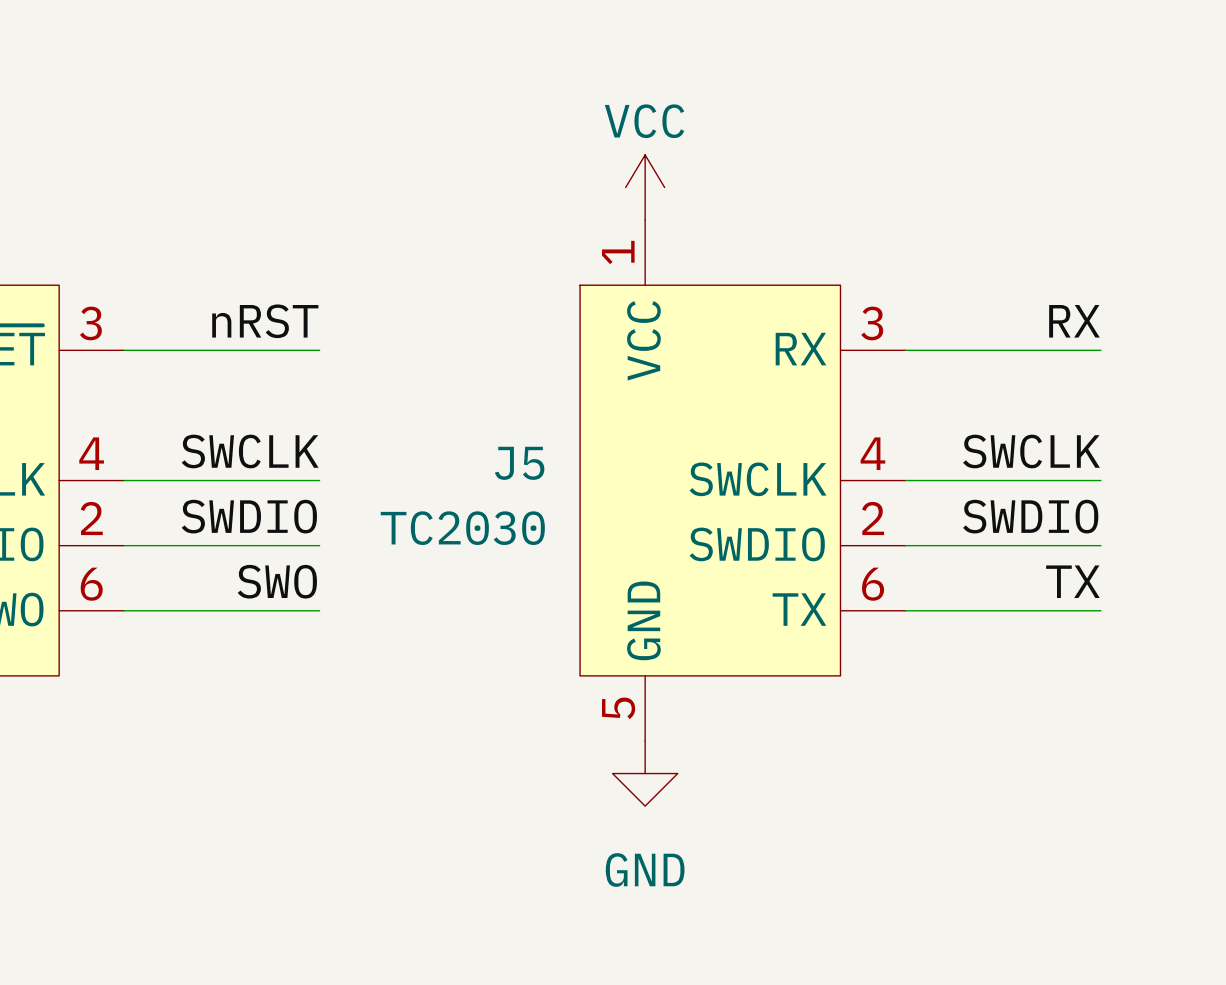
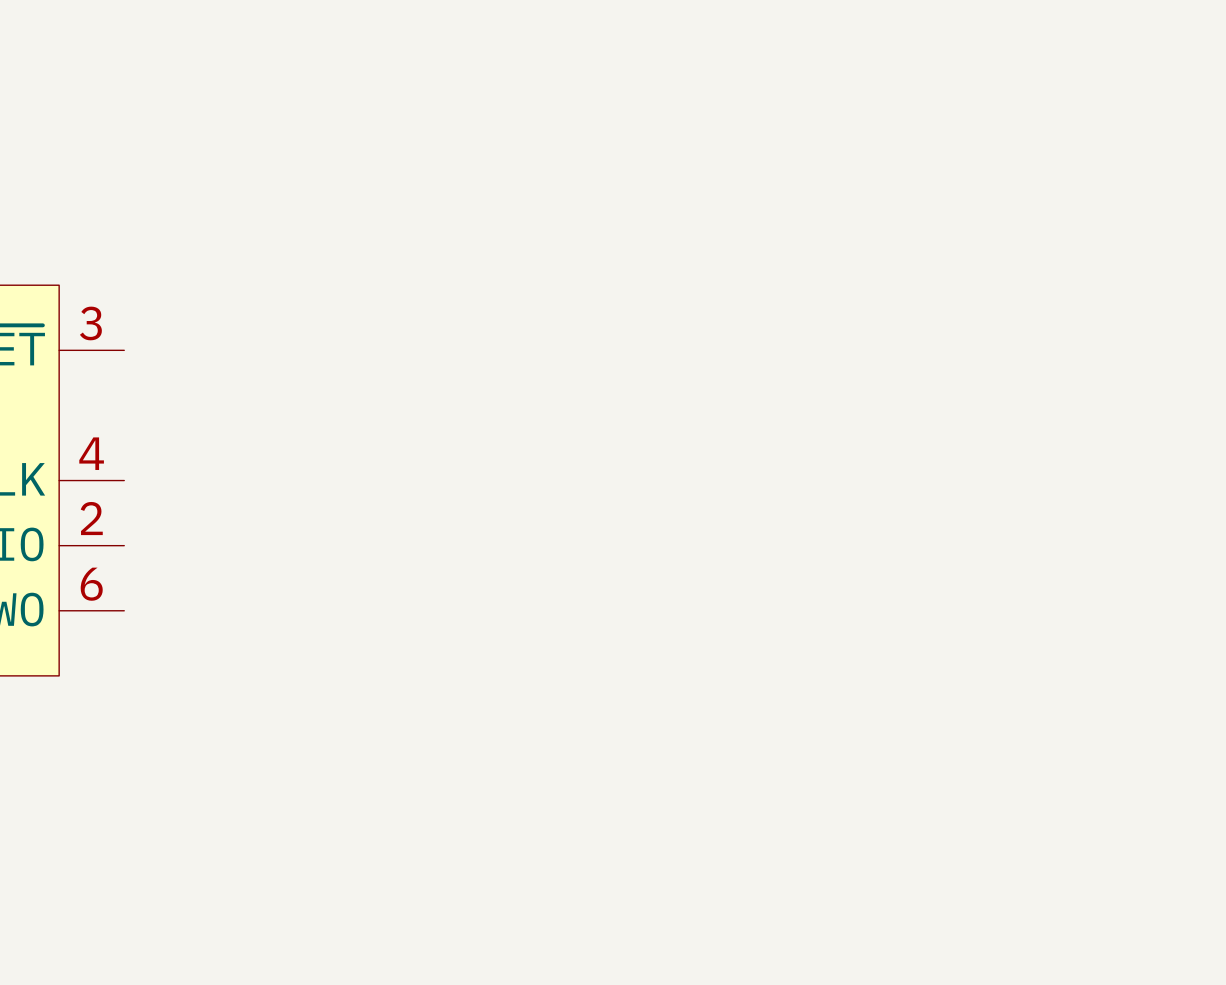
power symbol: VCC (645, 187) -> none
label: nRST (265, 321) -> none
label: RX (1074, 321) -> none
wire: (124, 350) (319, 350) -> none
wire: (905, 350) (1100, 350) -> none
label: SWCLK (250, 451) -> none
label: SWCLK (1031, 451) -> none
wire: (124, 480) (319, 480) -> none
J5: TC2030 (742, 480) -> none
wire: (905, 480) (1100, 480) -> none
label: SWDIO (249, 516) -> none
label: SWDIO (1030, 516) -> none
wire: (124, 545) (319, 545) -> none
wire: (905, 545) (1100, 545) -> none
label: SWO (277, 581) -> none
label: TX (1072, 581) -> none
wire: (124, 610) (319, 610) -> none
wire: (905, 610) (1100, 610) -> none
power symbol: GND (645, 773) -> none

